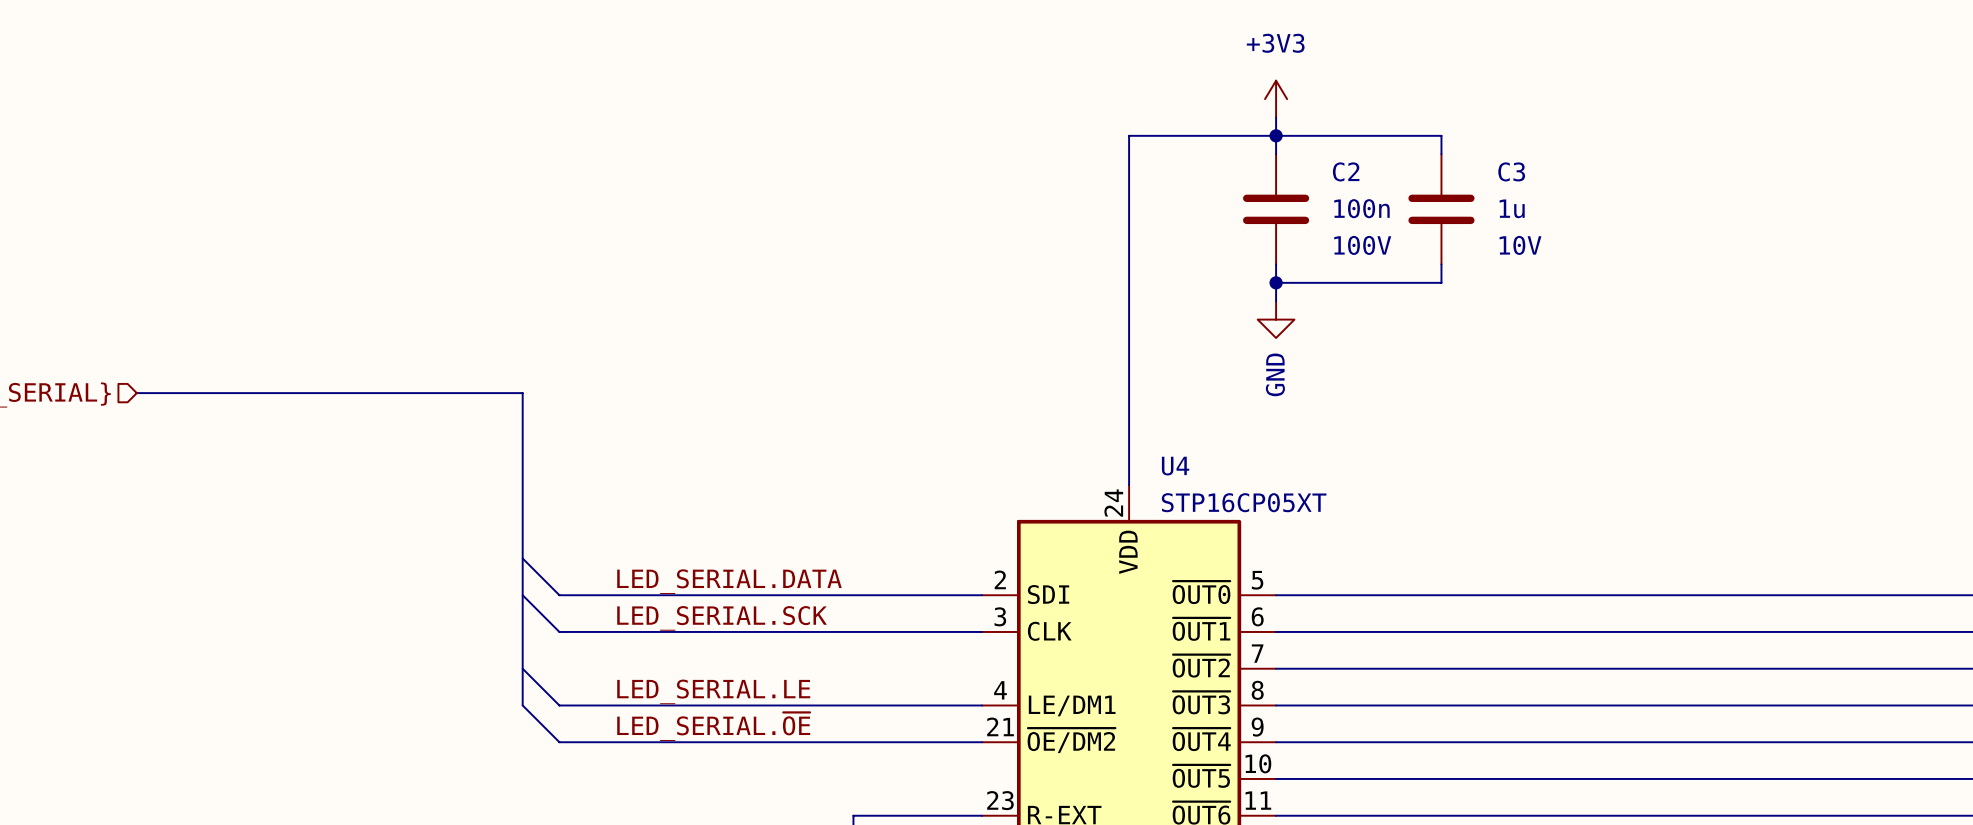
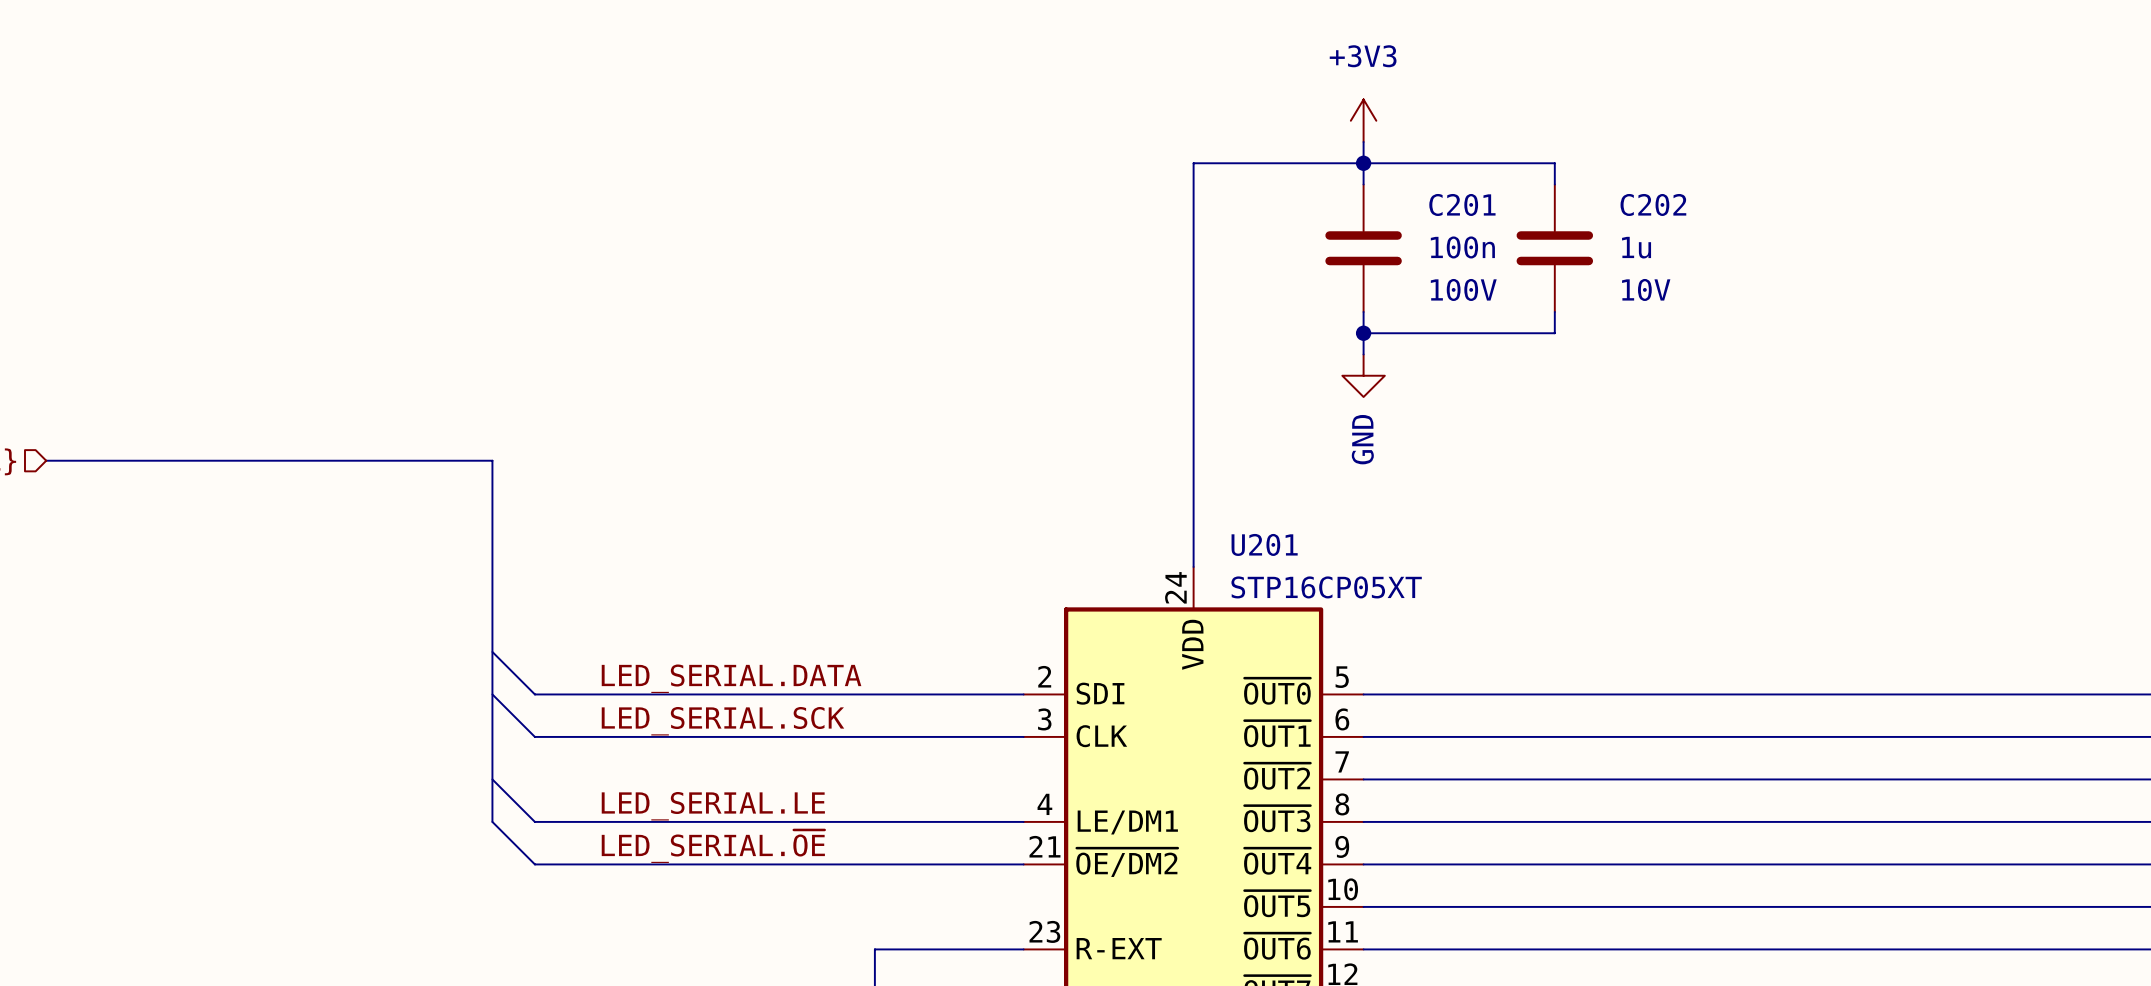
C2 name: C2 (1346, 171) -> C201 (1462, 204)
C3 name: C3 (1511, 171) -> C202 (1653, 204)
U4 name: U4 (1175, 466) -> U201 (1264, 544)

